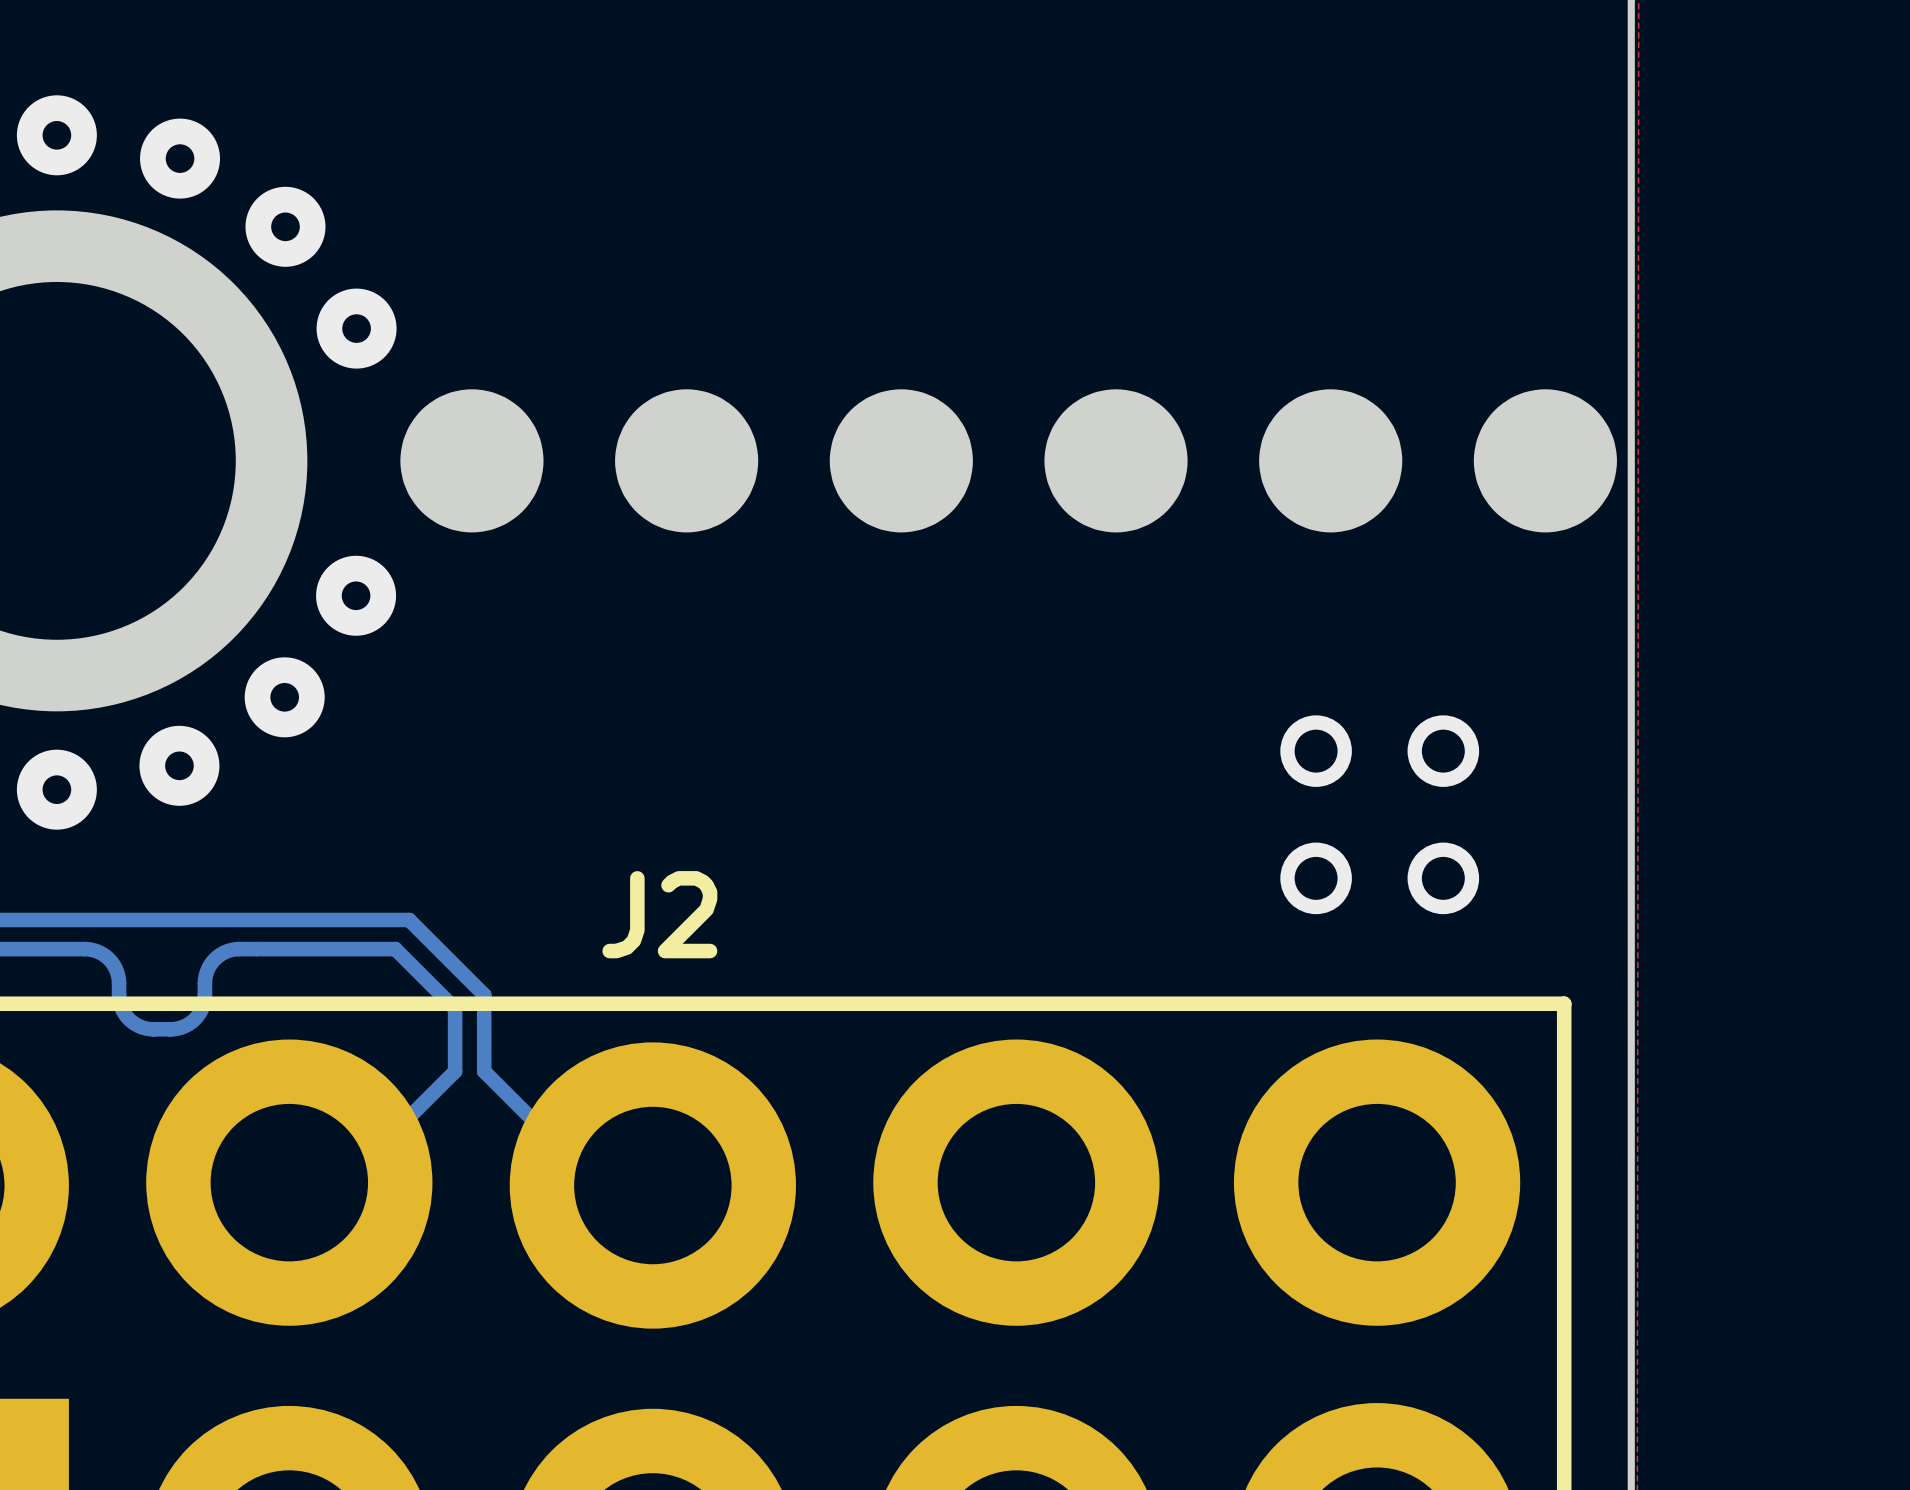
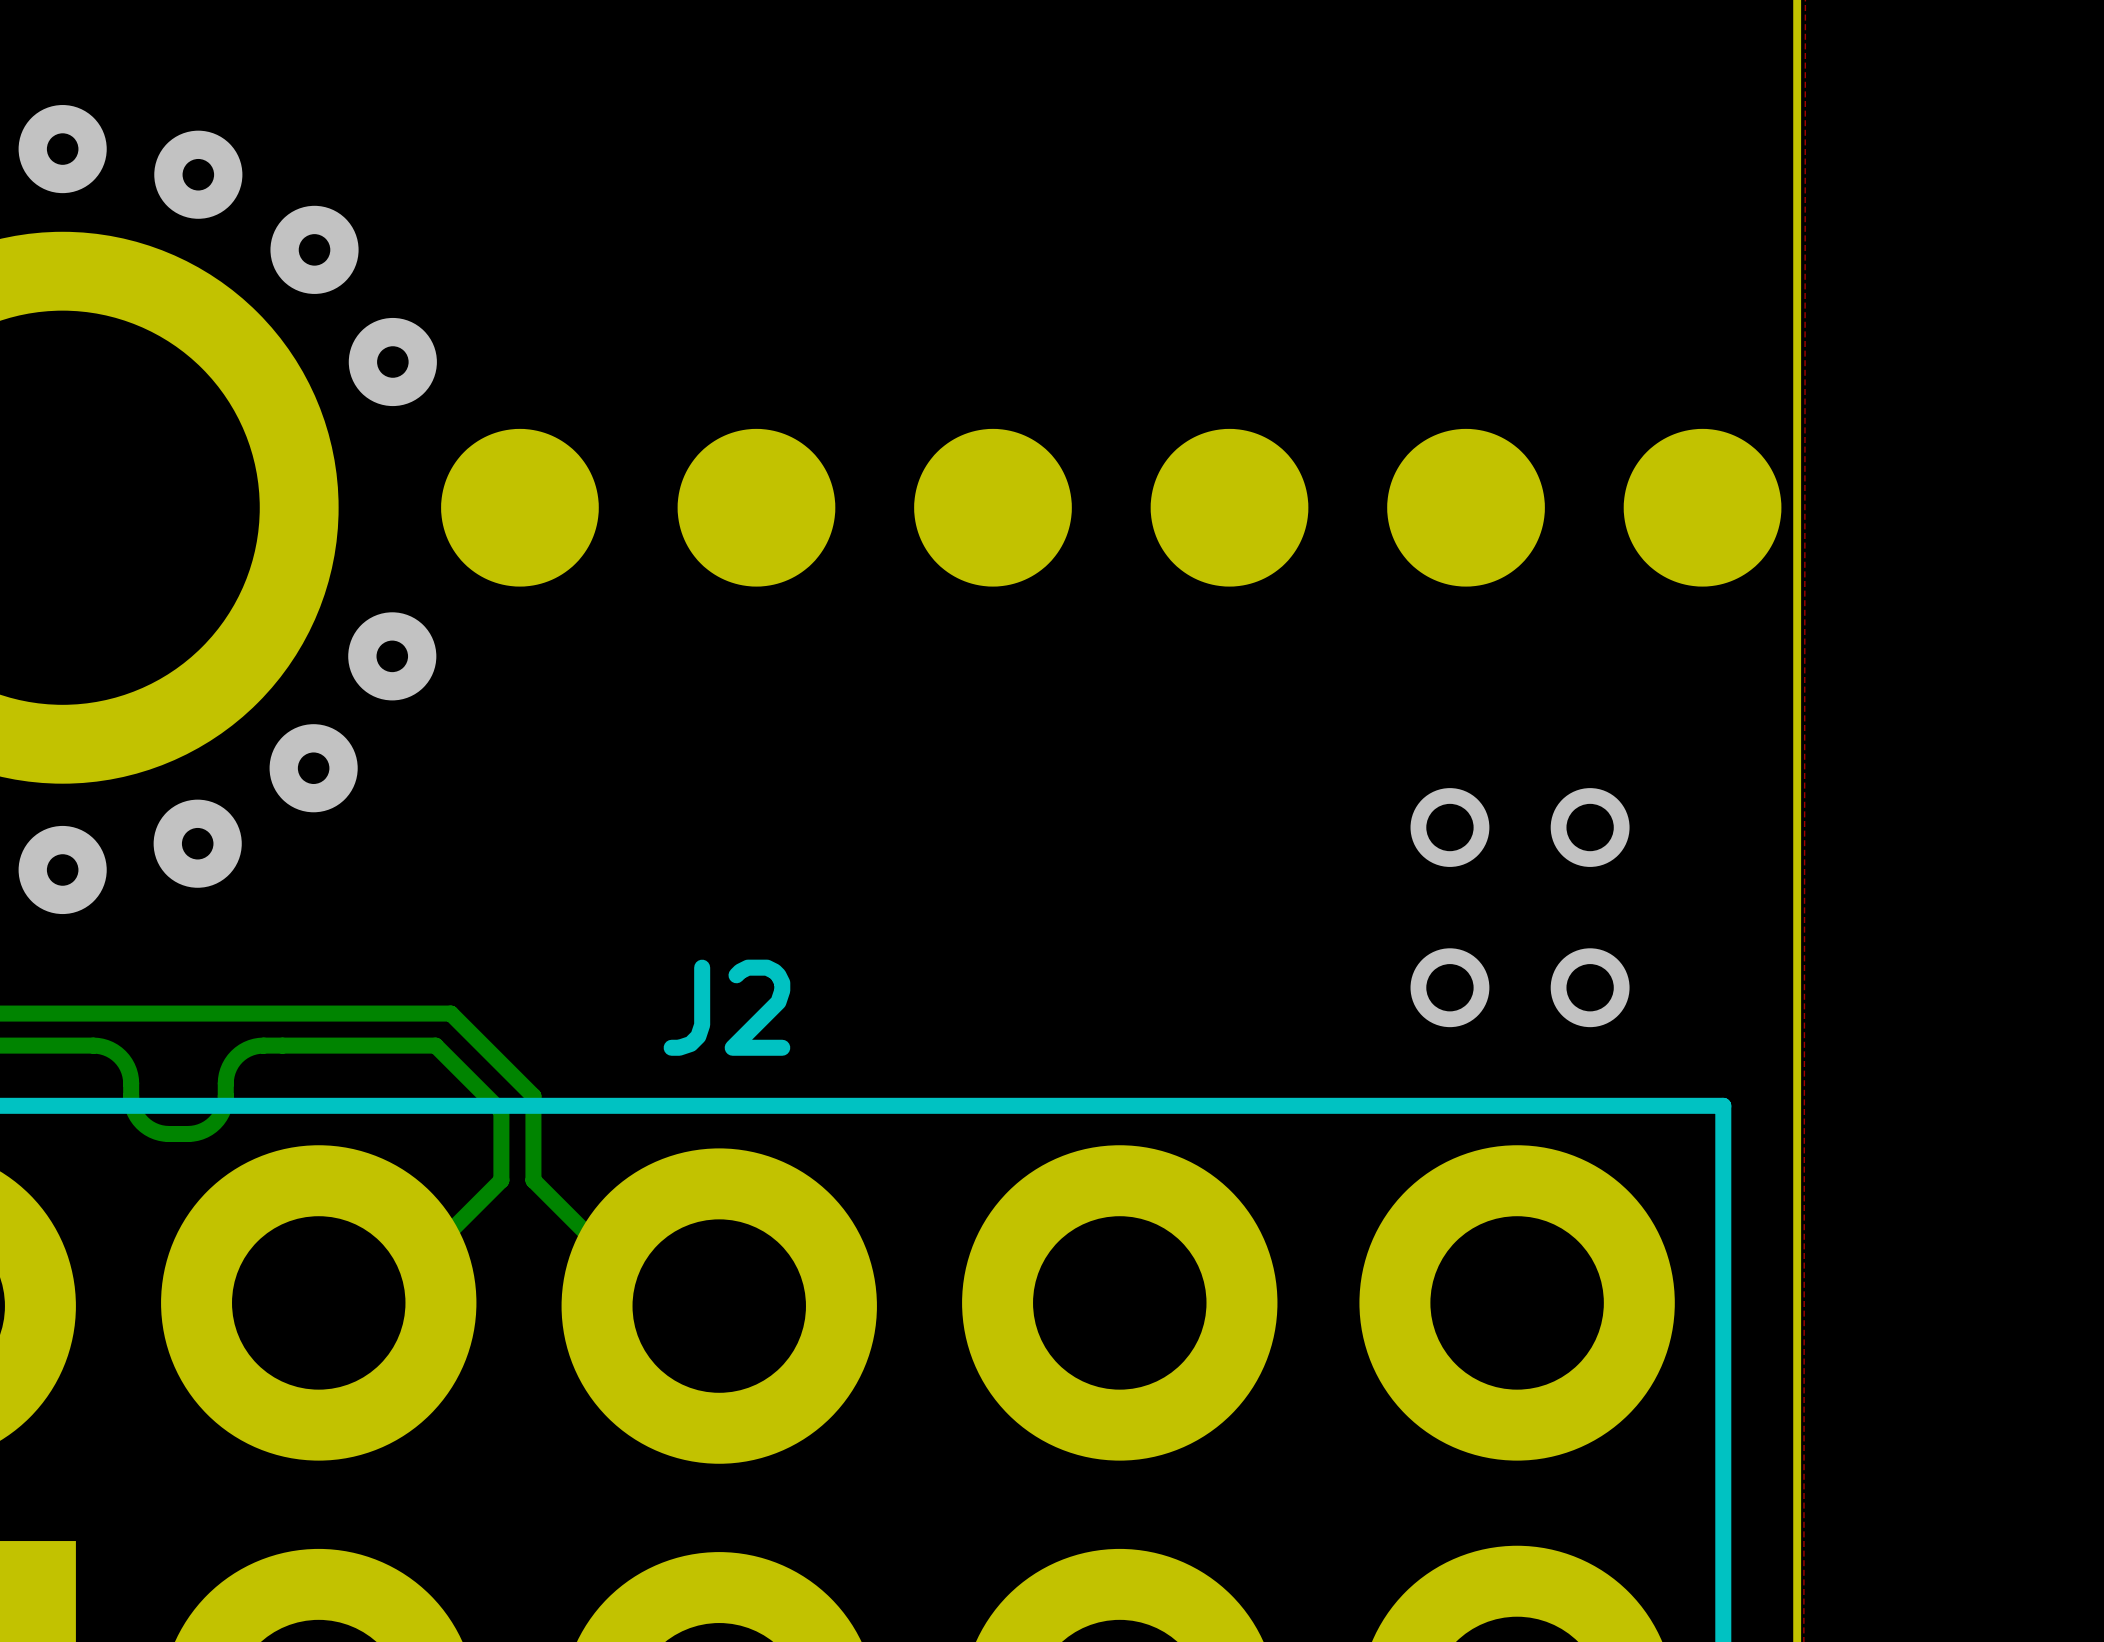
via position: (1316, 878) -> (1449, 987)
via position: (1443, 878) -> (1590, 987)

